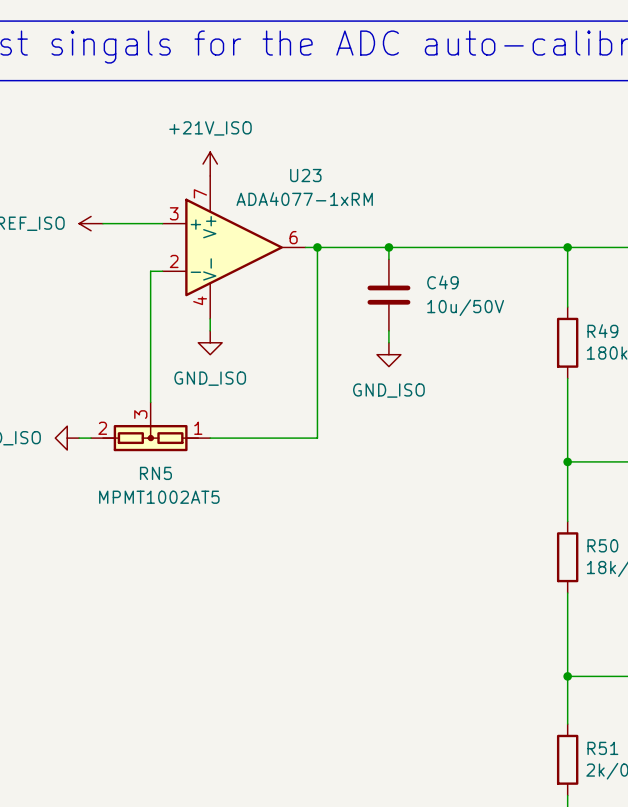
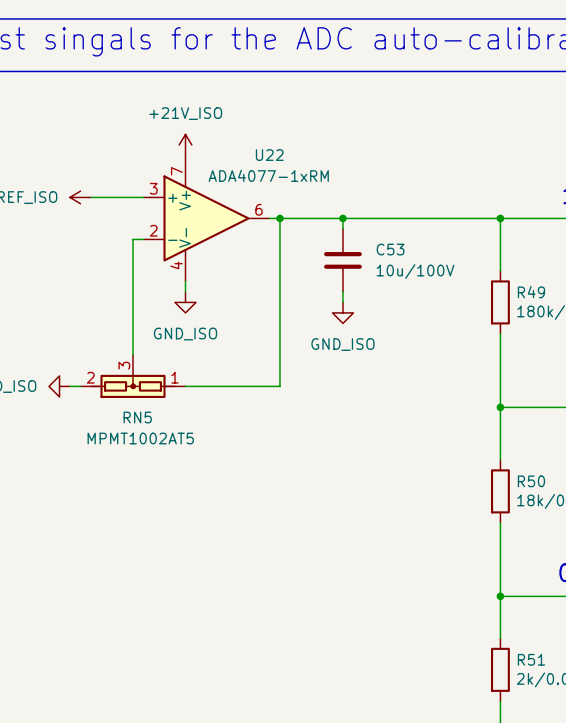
U23 name: U23 (305, 175) -> U22 (269, 155)
C49 name: C49 (442, 282) -> C53 (390, 249)
C49 value: 10u/50V (465, 307) -> 10u/100V (415, 271)

